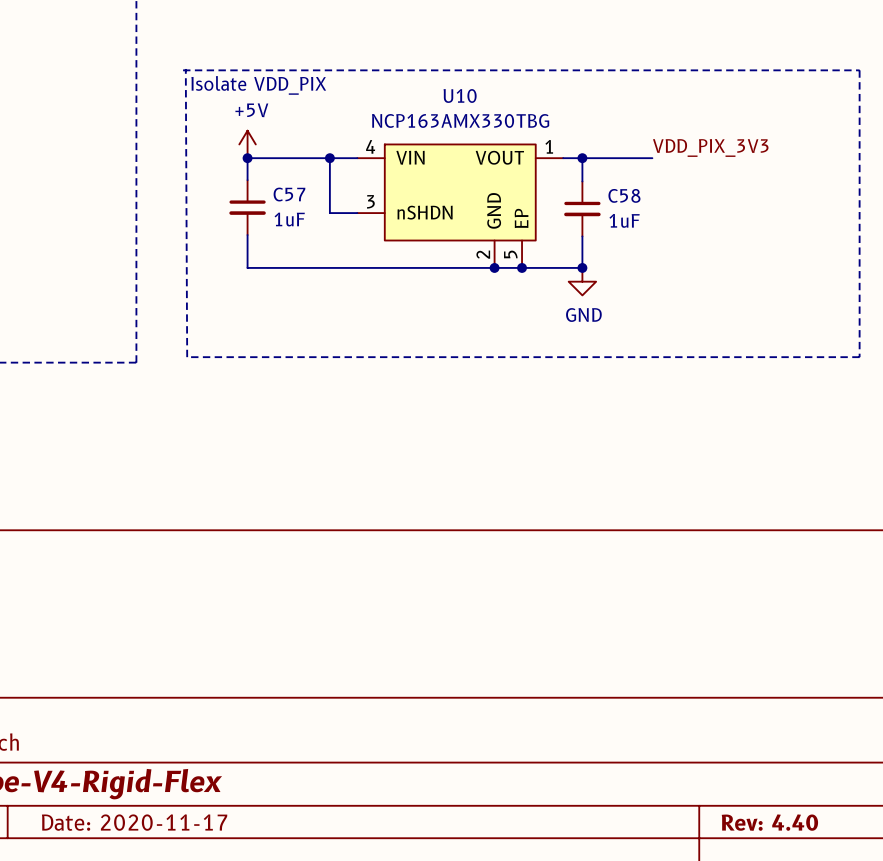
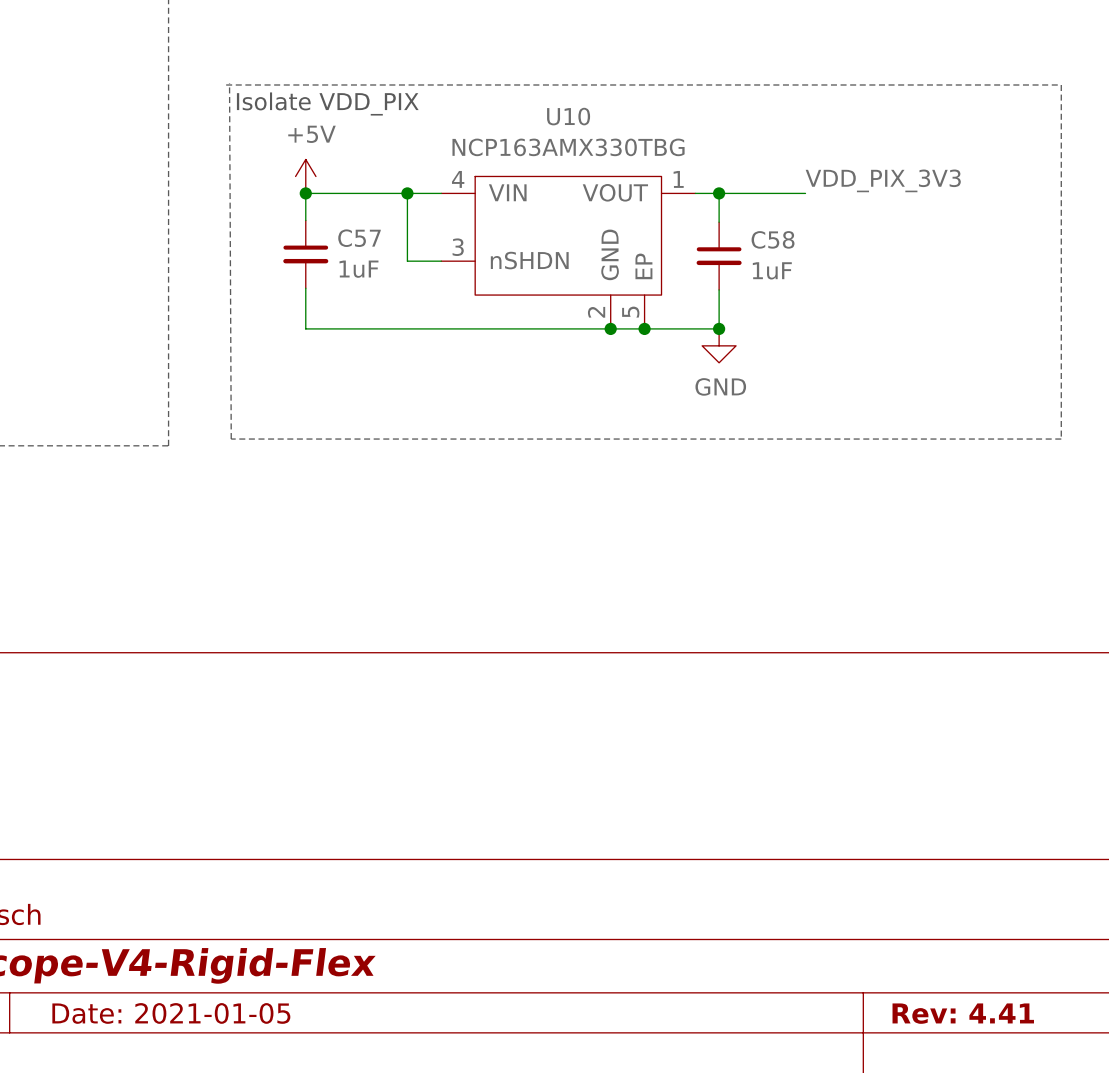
title block: Date: 2020-11-17 (134, 822) -> Date: 2021-01-05 (171, 1013)
title block: Rev: 4.40 (769, 822) -> Rev: 4.41 (963, 1013)

